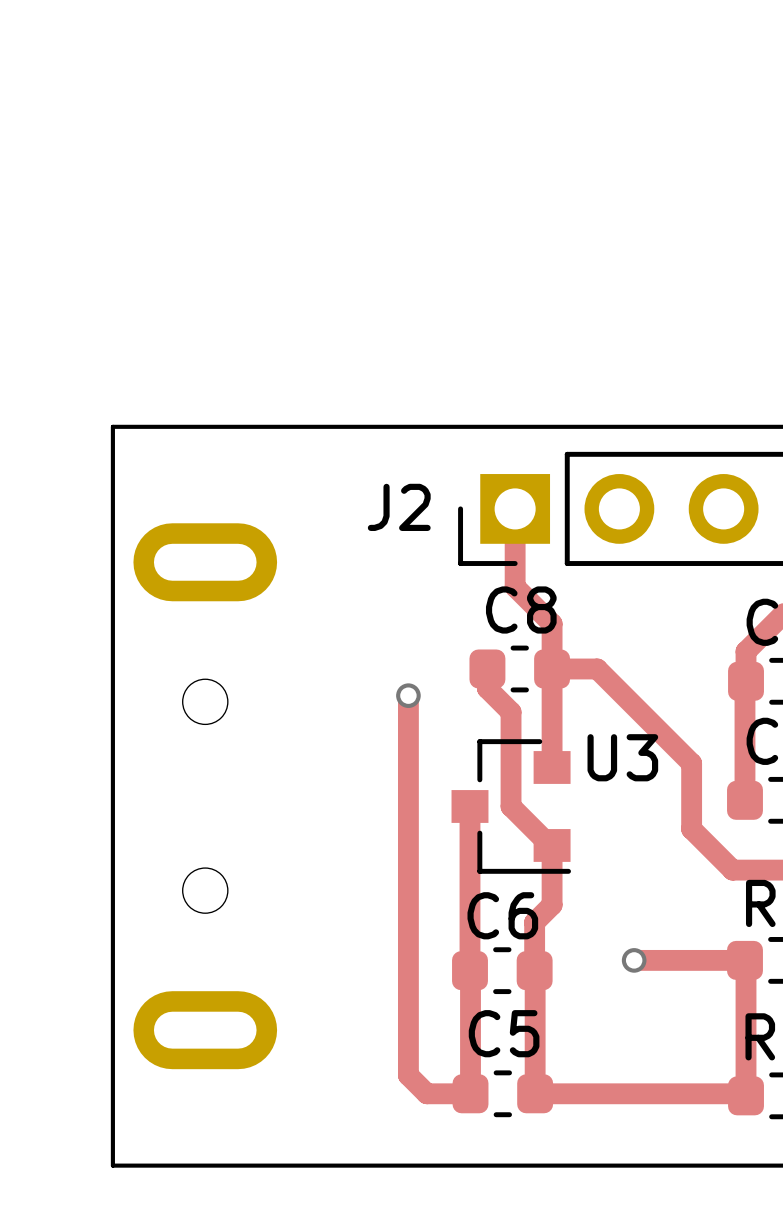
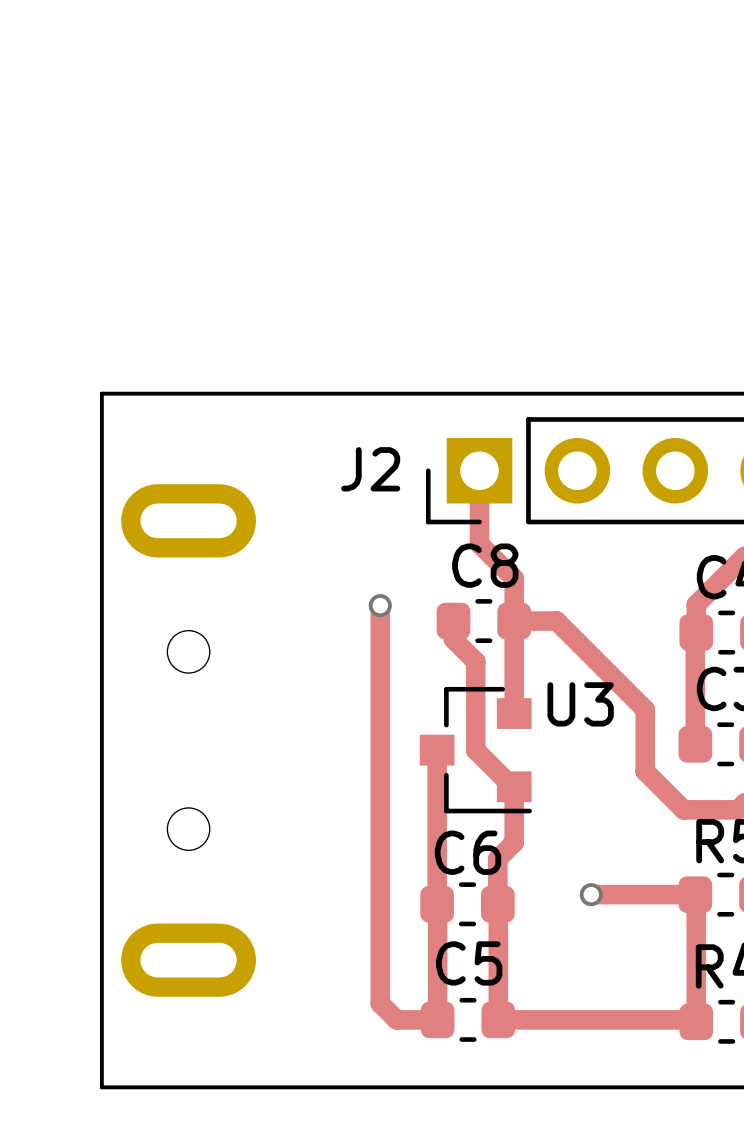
track: (408, 695) (409, 1076) -> (380, 605) (380, 1003)
via position: (408, 695) -> (380, 605)

